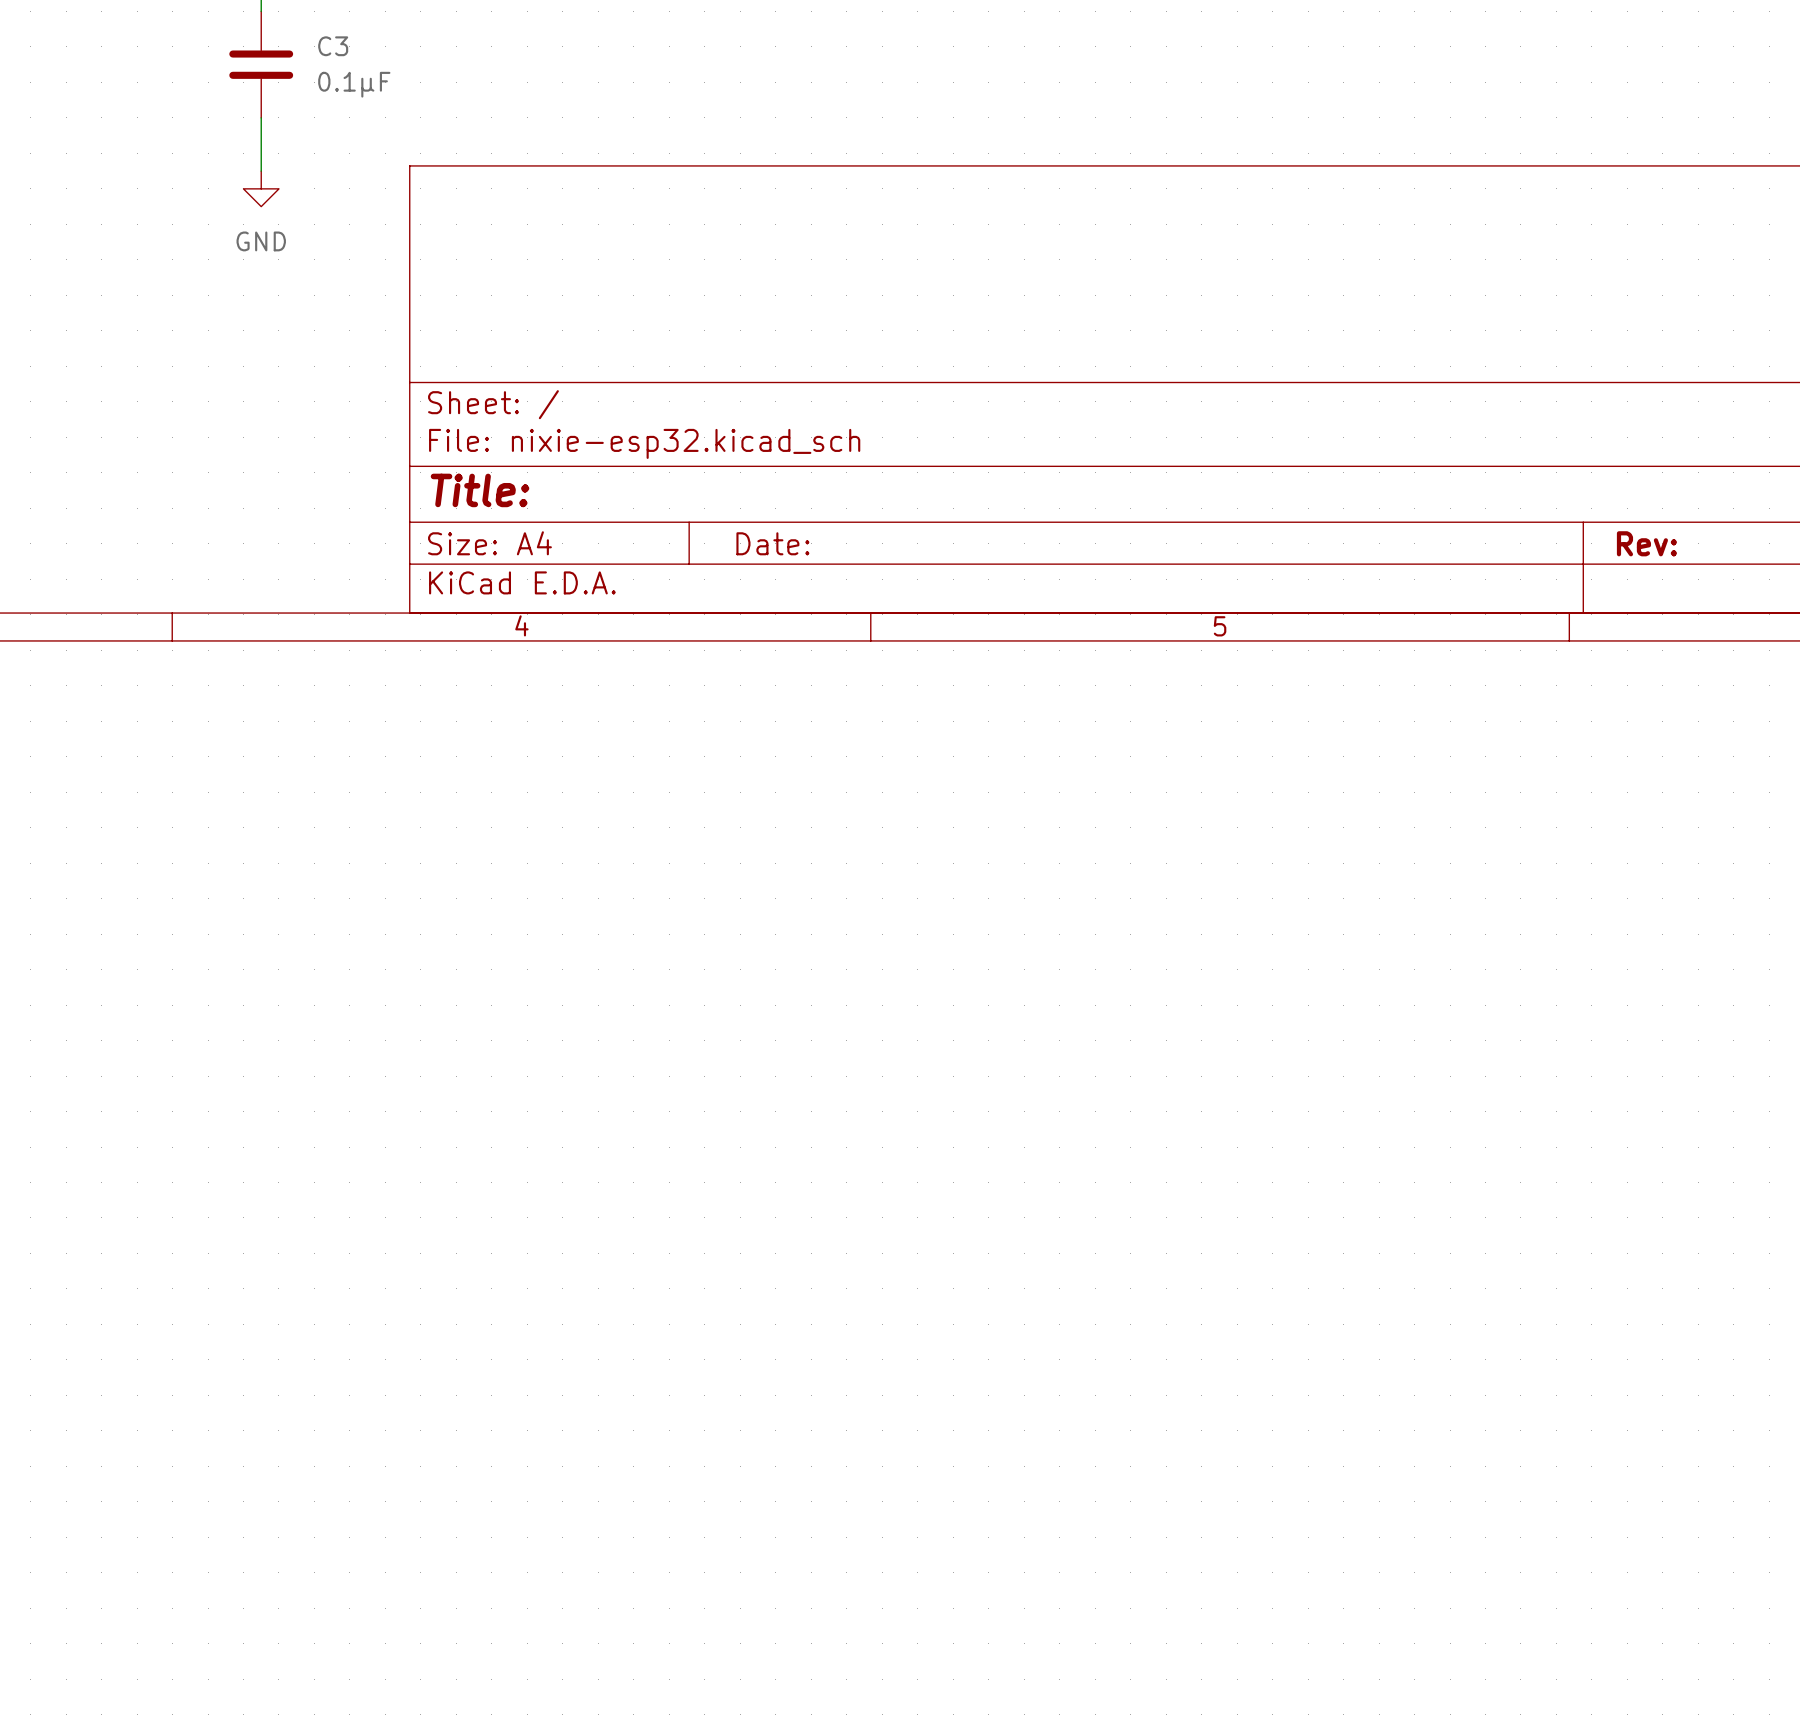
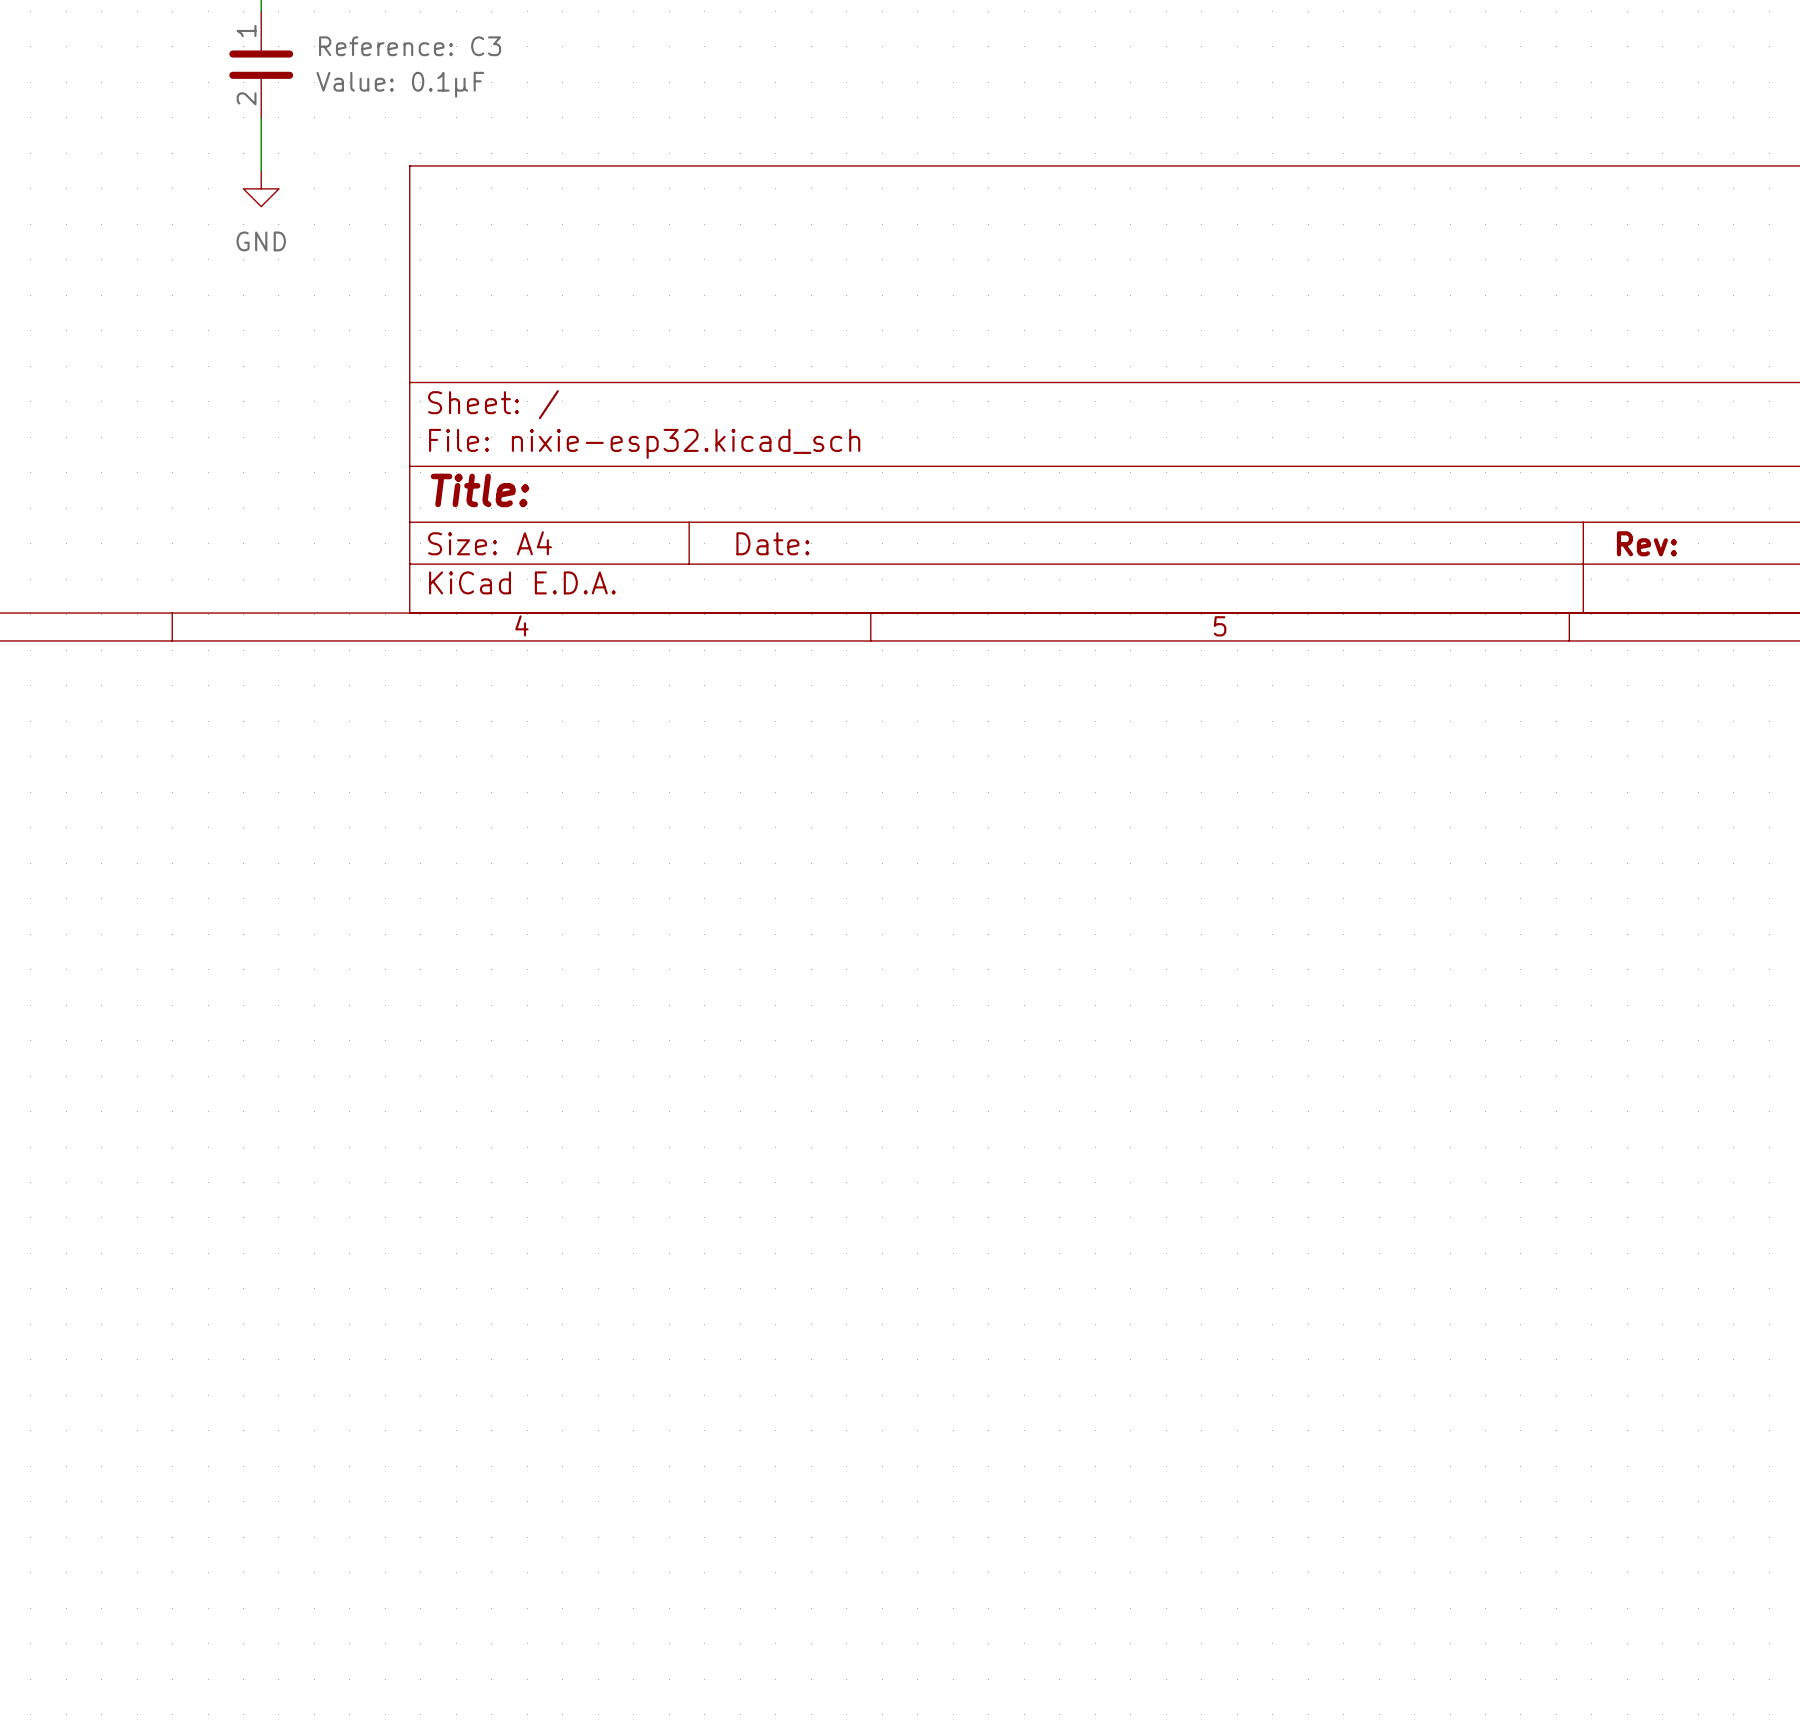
C3 pin number: none -> 1 (246, 30)
C3 name: C3 (333, 46) -> Reference: C3 (410, 46)
C3 value: 0.1µF (354, 84) -> Value: 0.1µF (400, 84)
C3 pin number: none -> 2 (246, 98)

